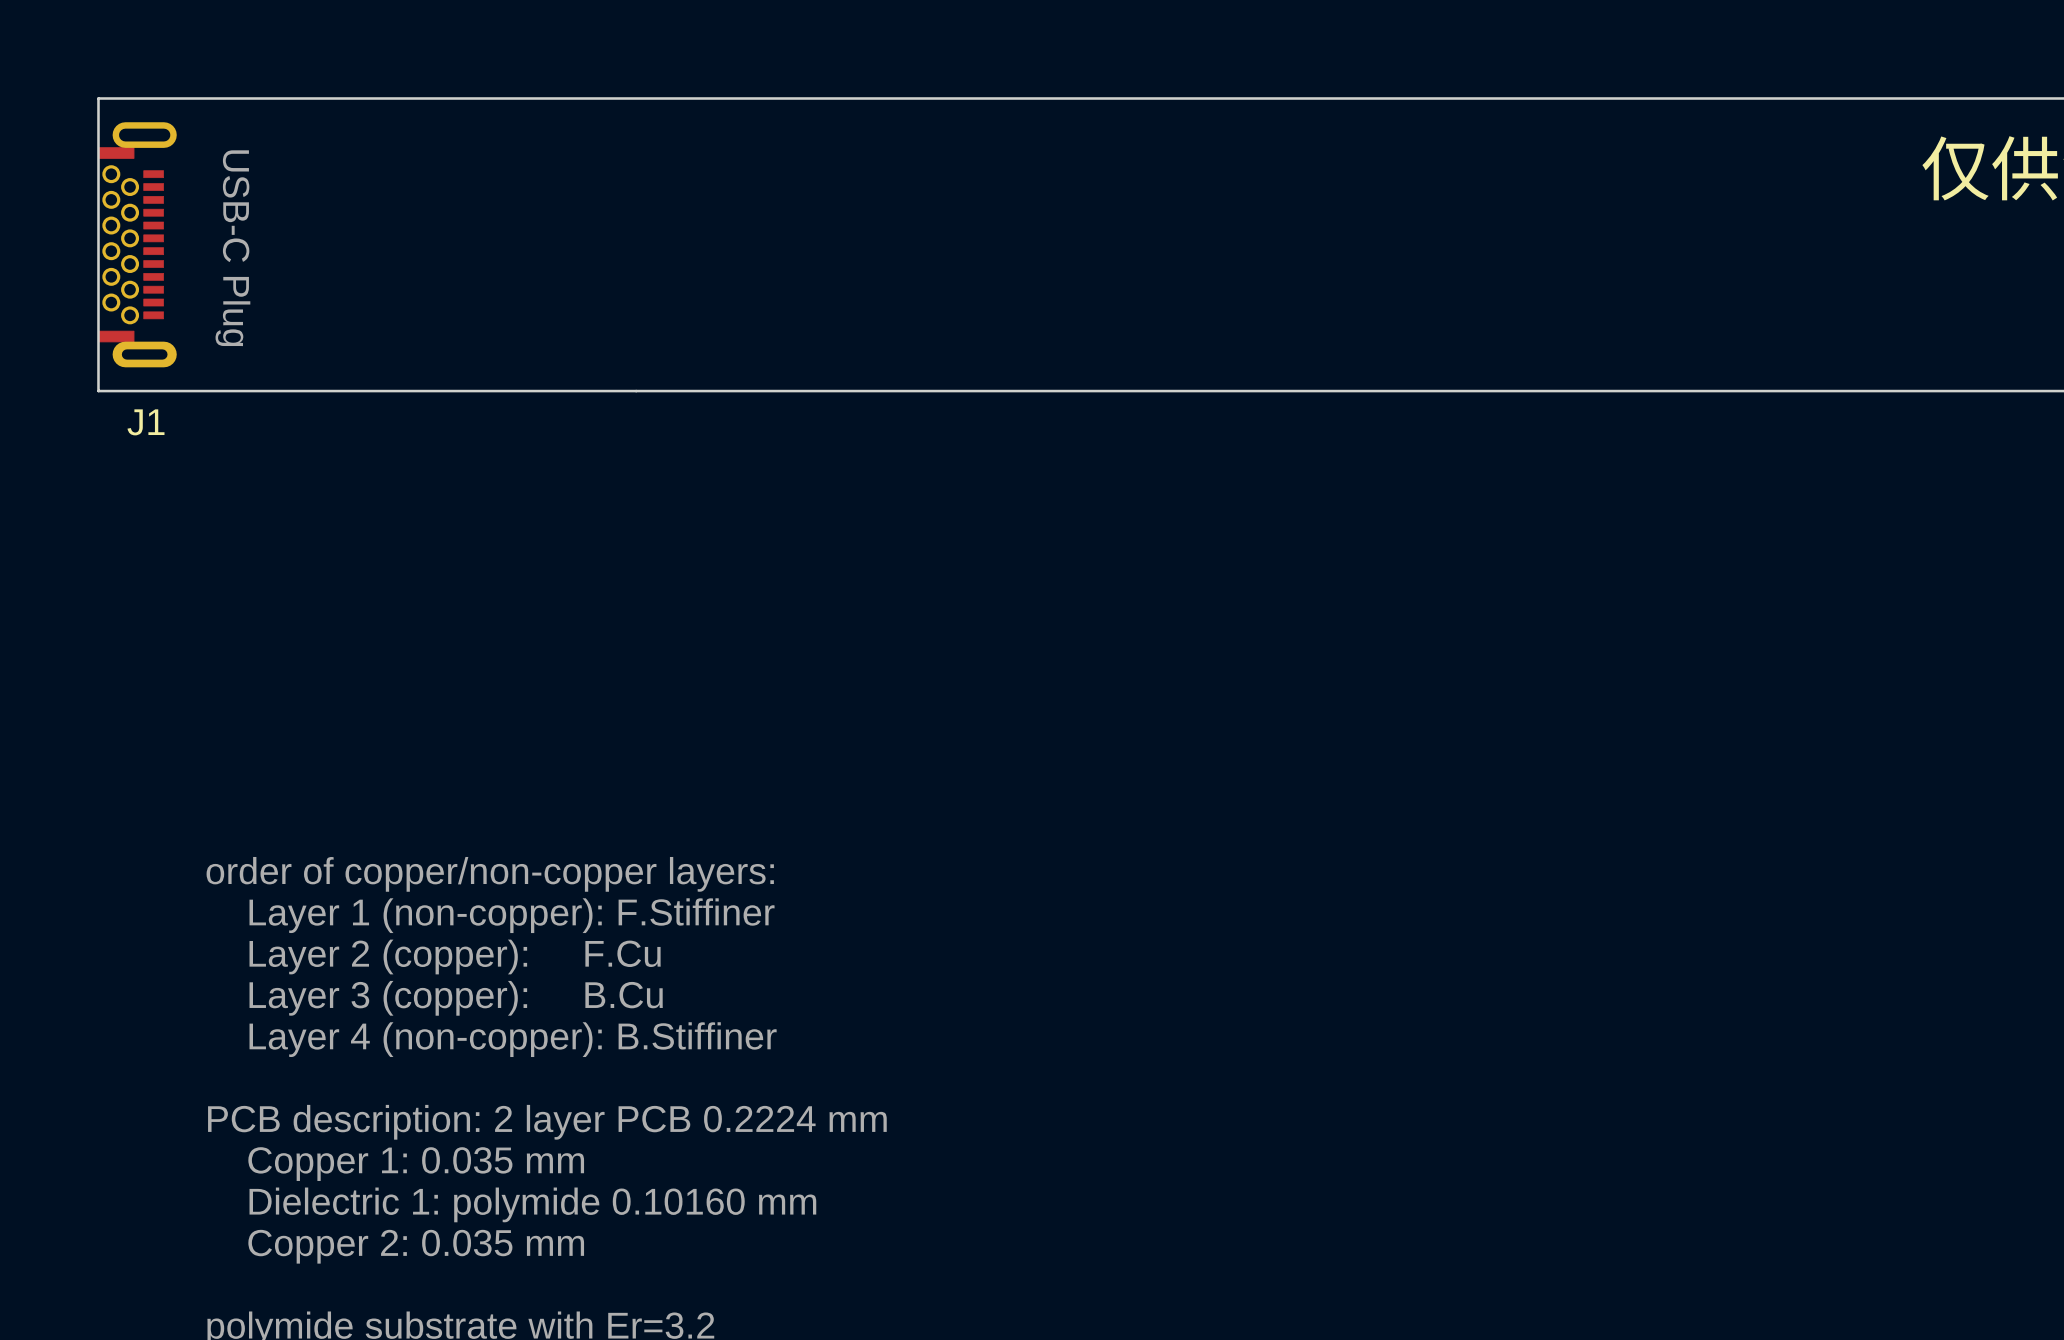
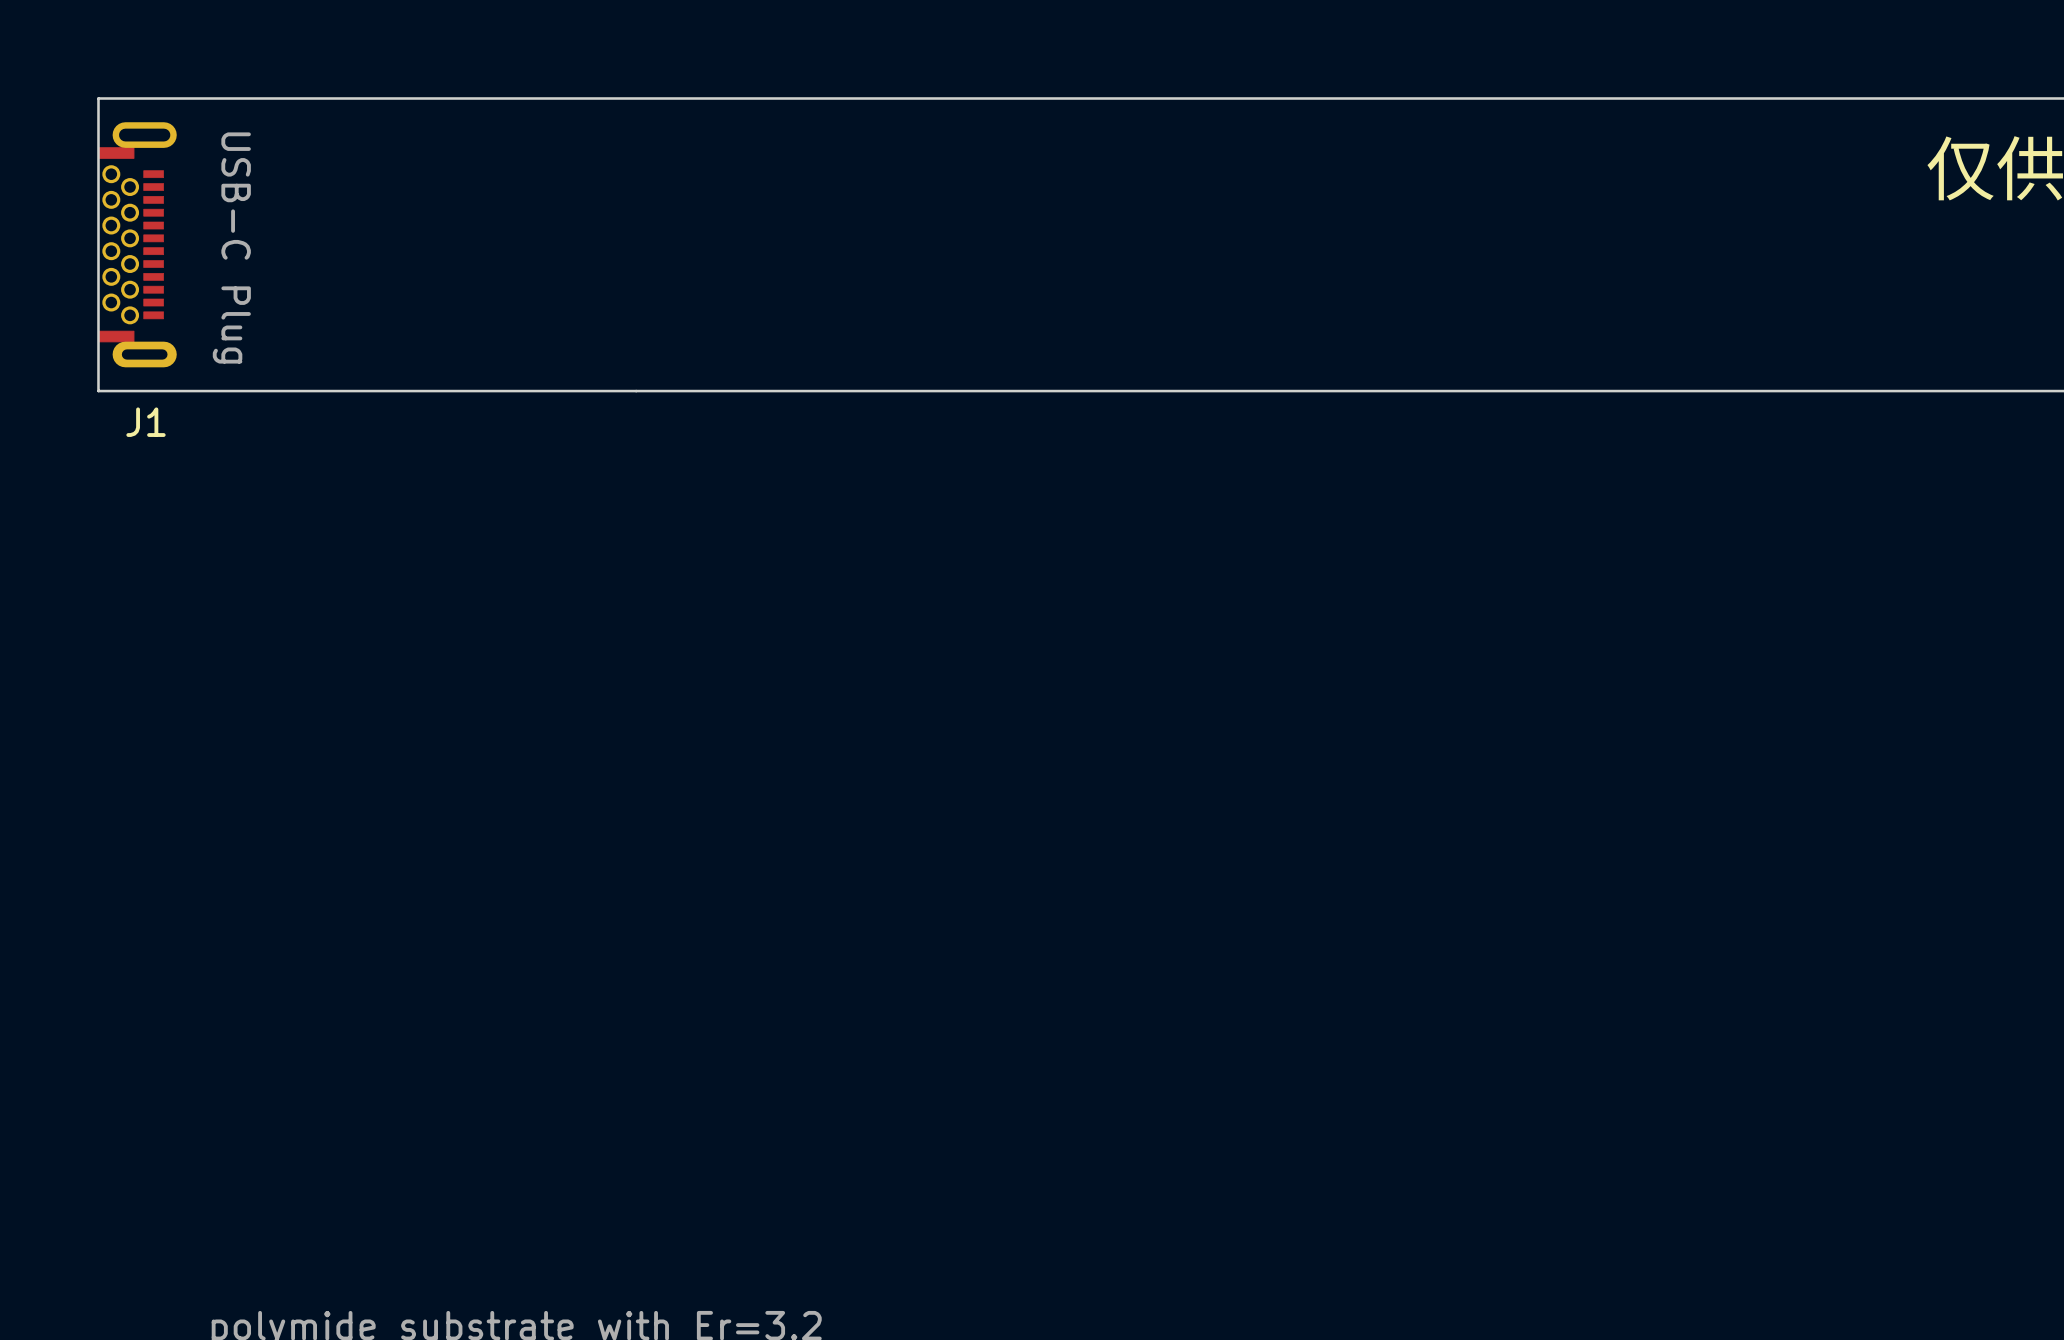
text: order of copper/non-copper layers: (490, 874) -> none
text: Layer 1 (non-copper): F.Stiffiner (512, 915) -> none
text: Layer 2 (copper): F.Cu (455, 957) -> none
text: Layer 3 (copper): B.Cu (456, 998) -> none
text: Layer 4 (non-copper): B.Stiffiner (513, 1039) -> none
text: PCB description: 2 layer PCB 0.2224 mm (547, 1122) -> none
text: Copper 1: 0.035 mm (416, 1164) -> none
text: Dielectric 1: polymide 0.10160 mm (532, 1204) -> none
text: Copper 2: 0.035 mm (416, 1246) -> none

